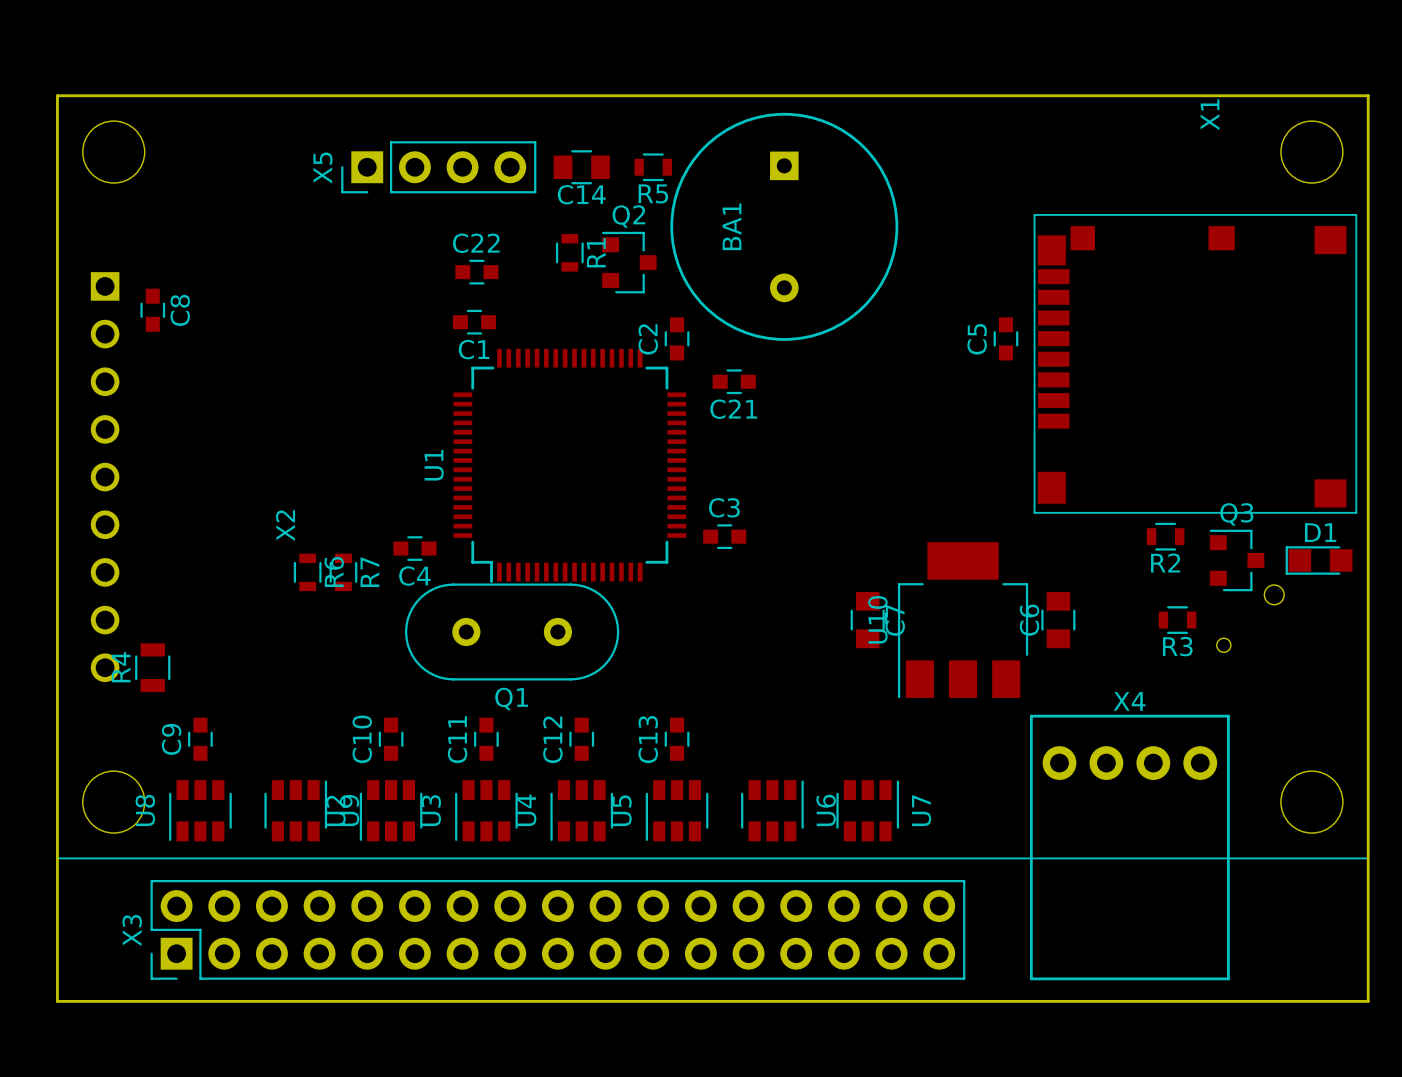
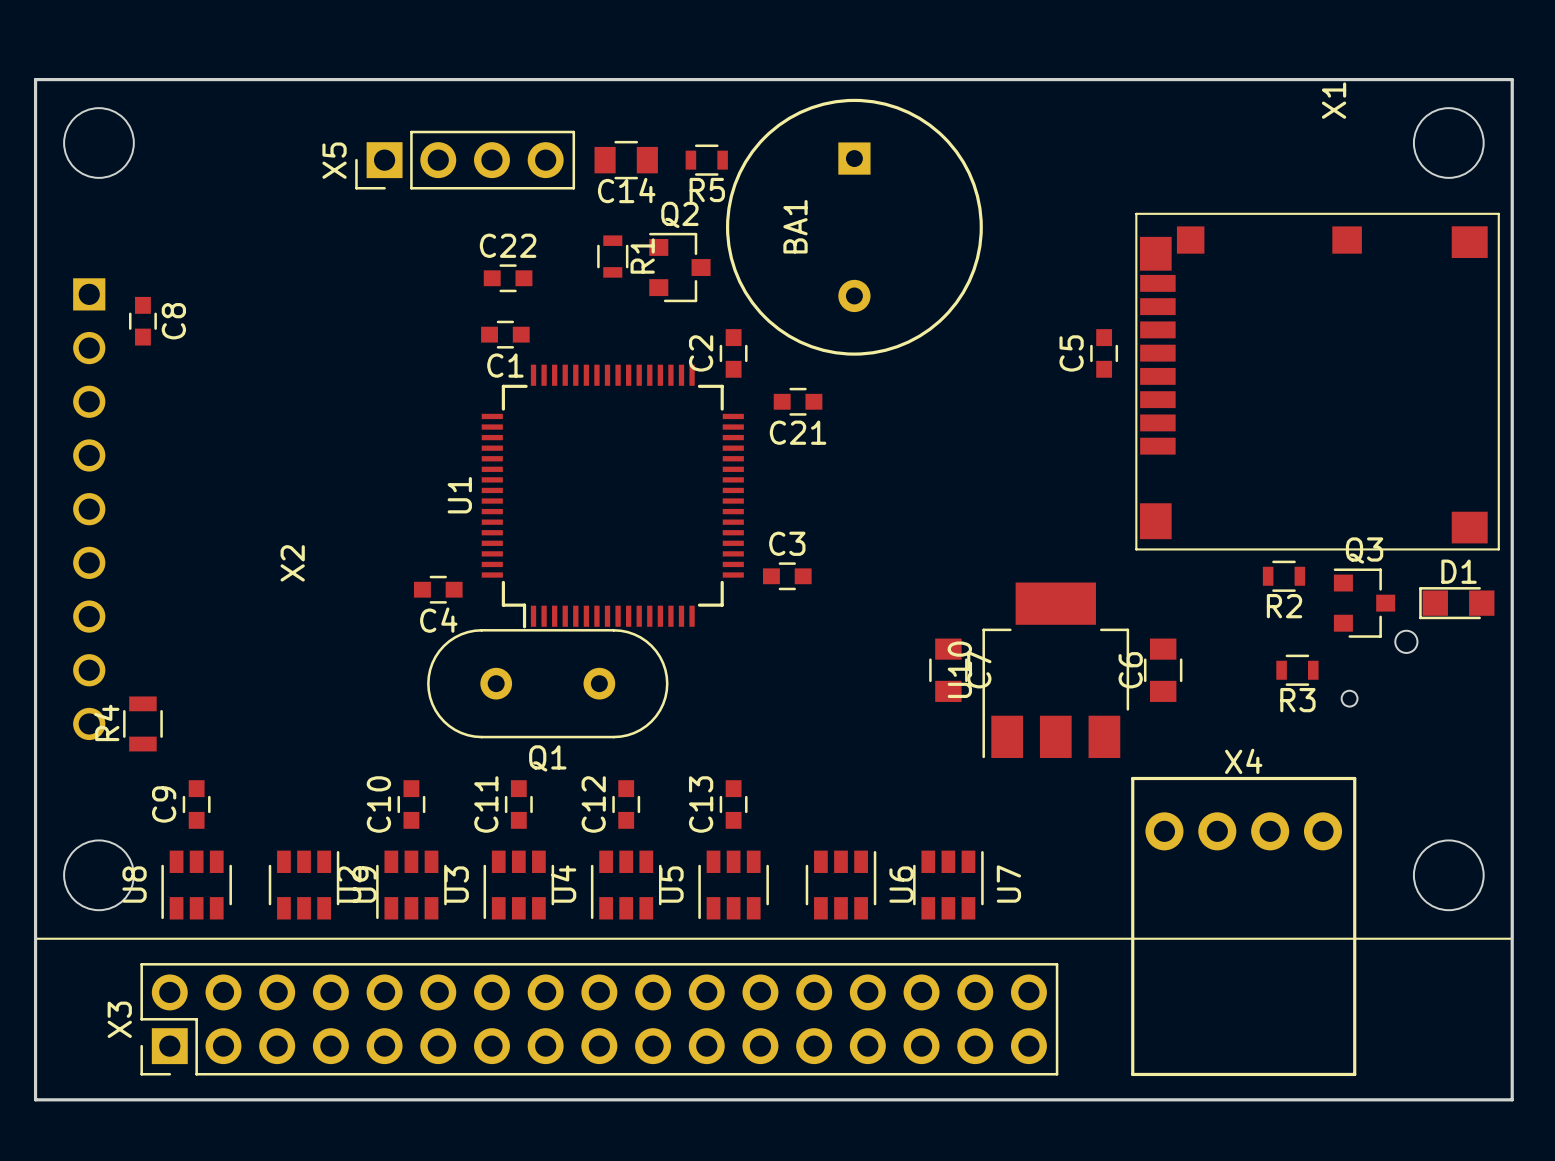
R6: (307, 572) -> none
R7: (343, 572) -> none

